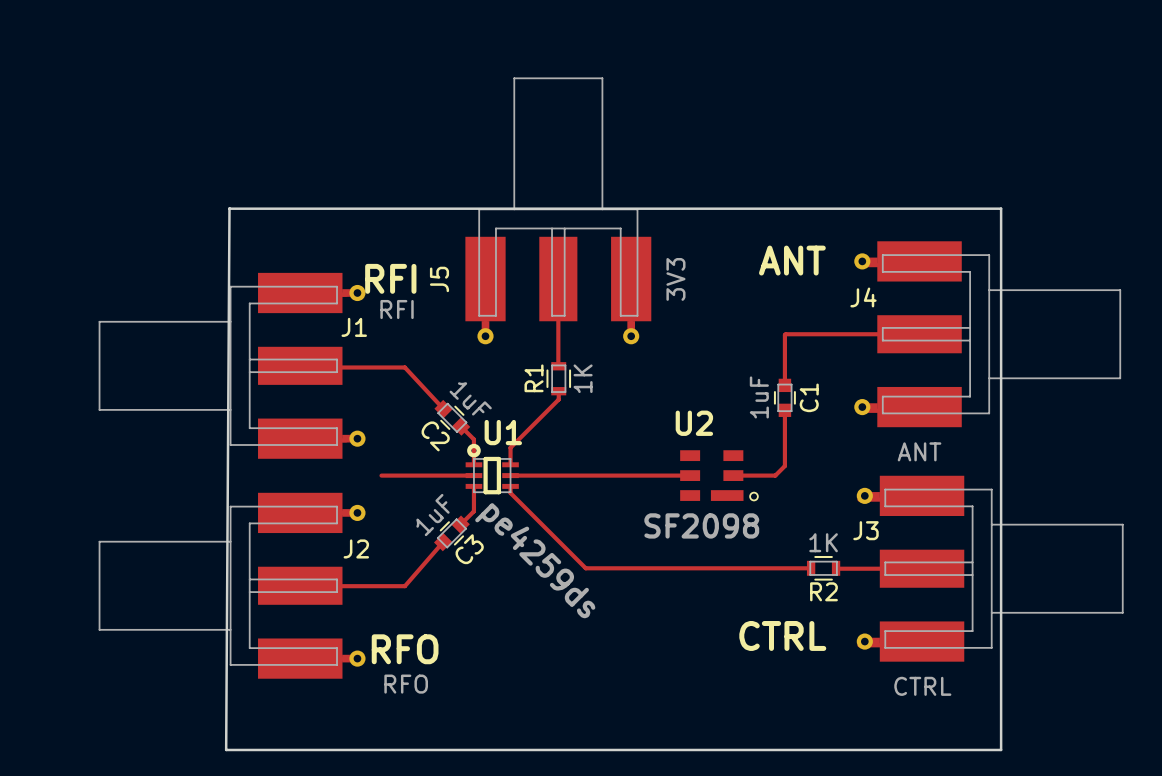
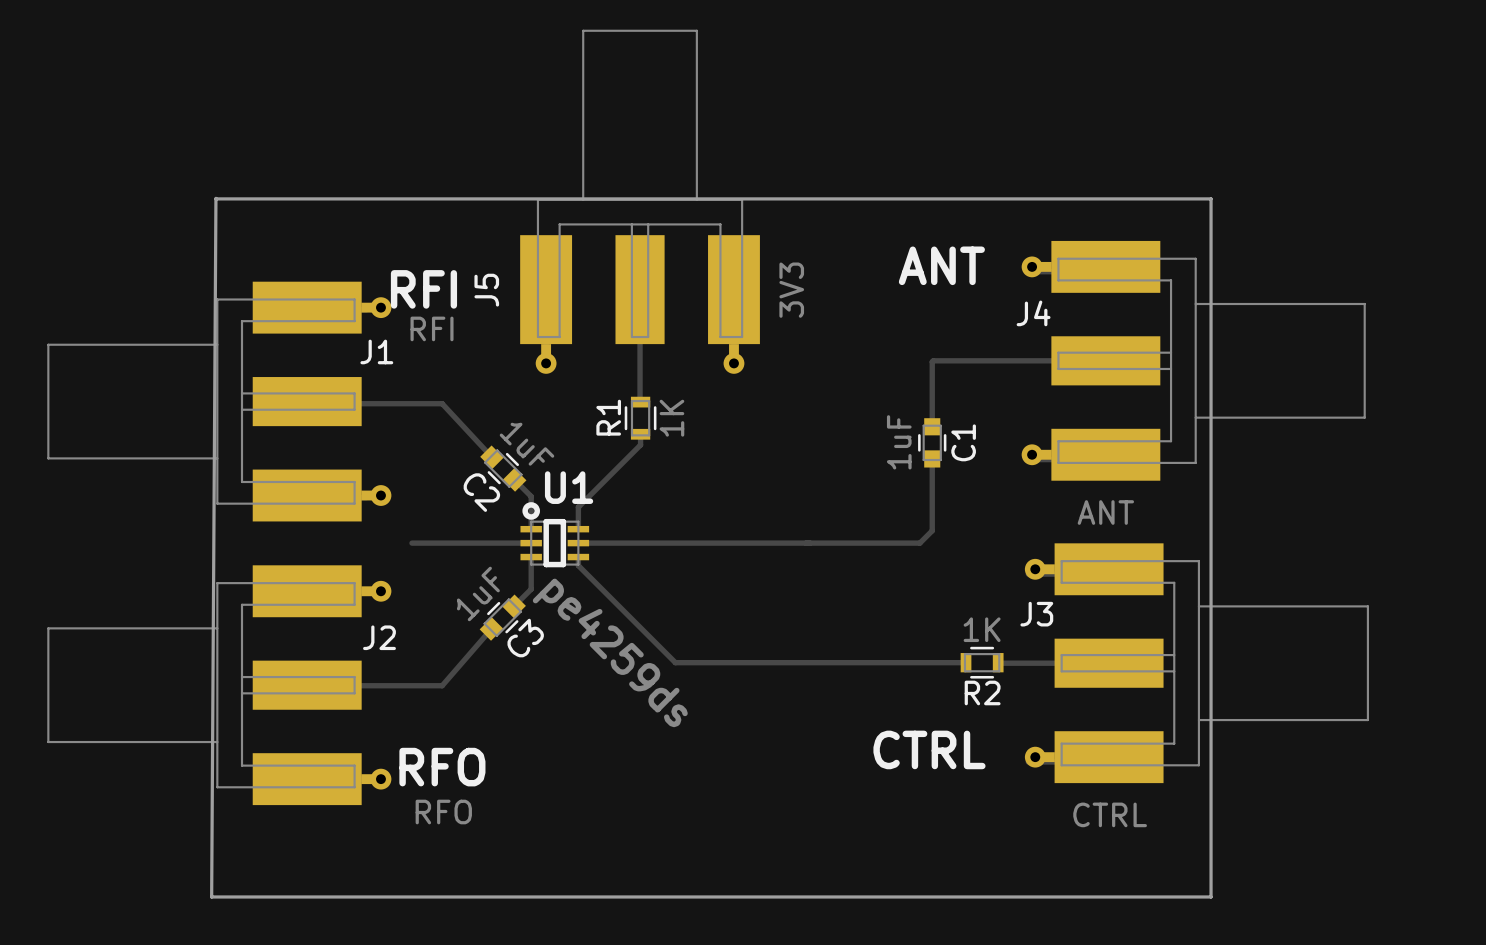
track: none -> (810, 543) (865, 543)
U2: SF2098 (719, 475) -> none

